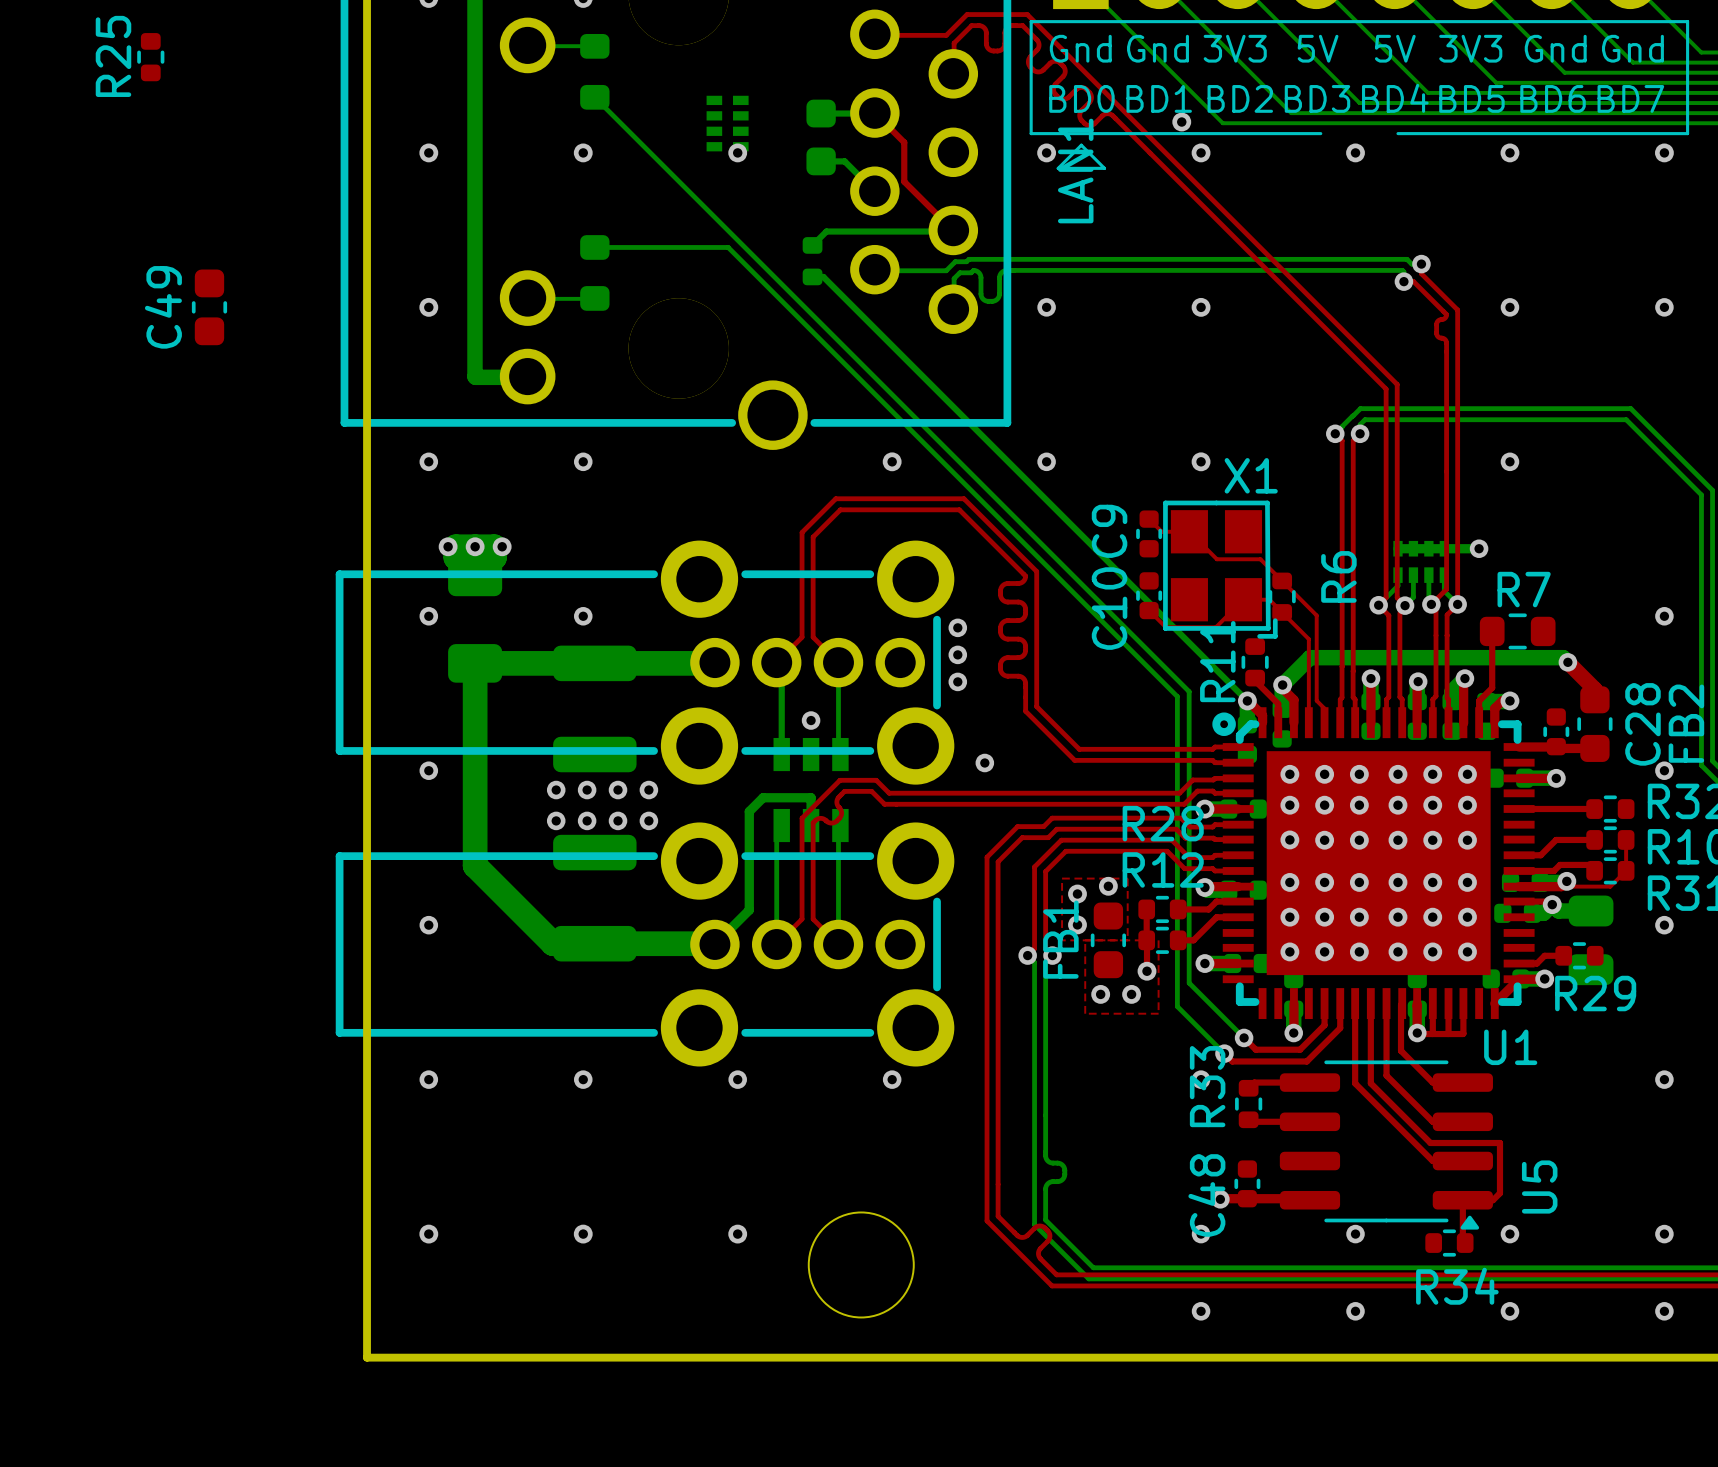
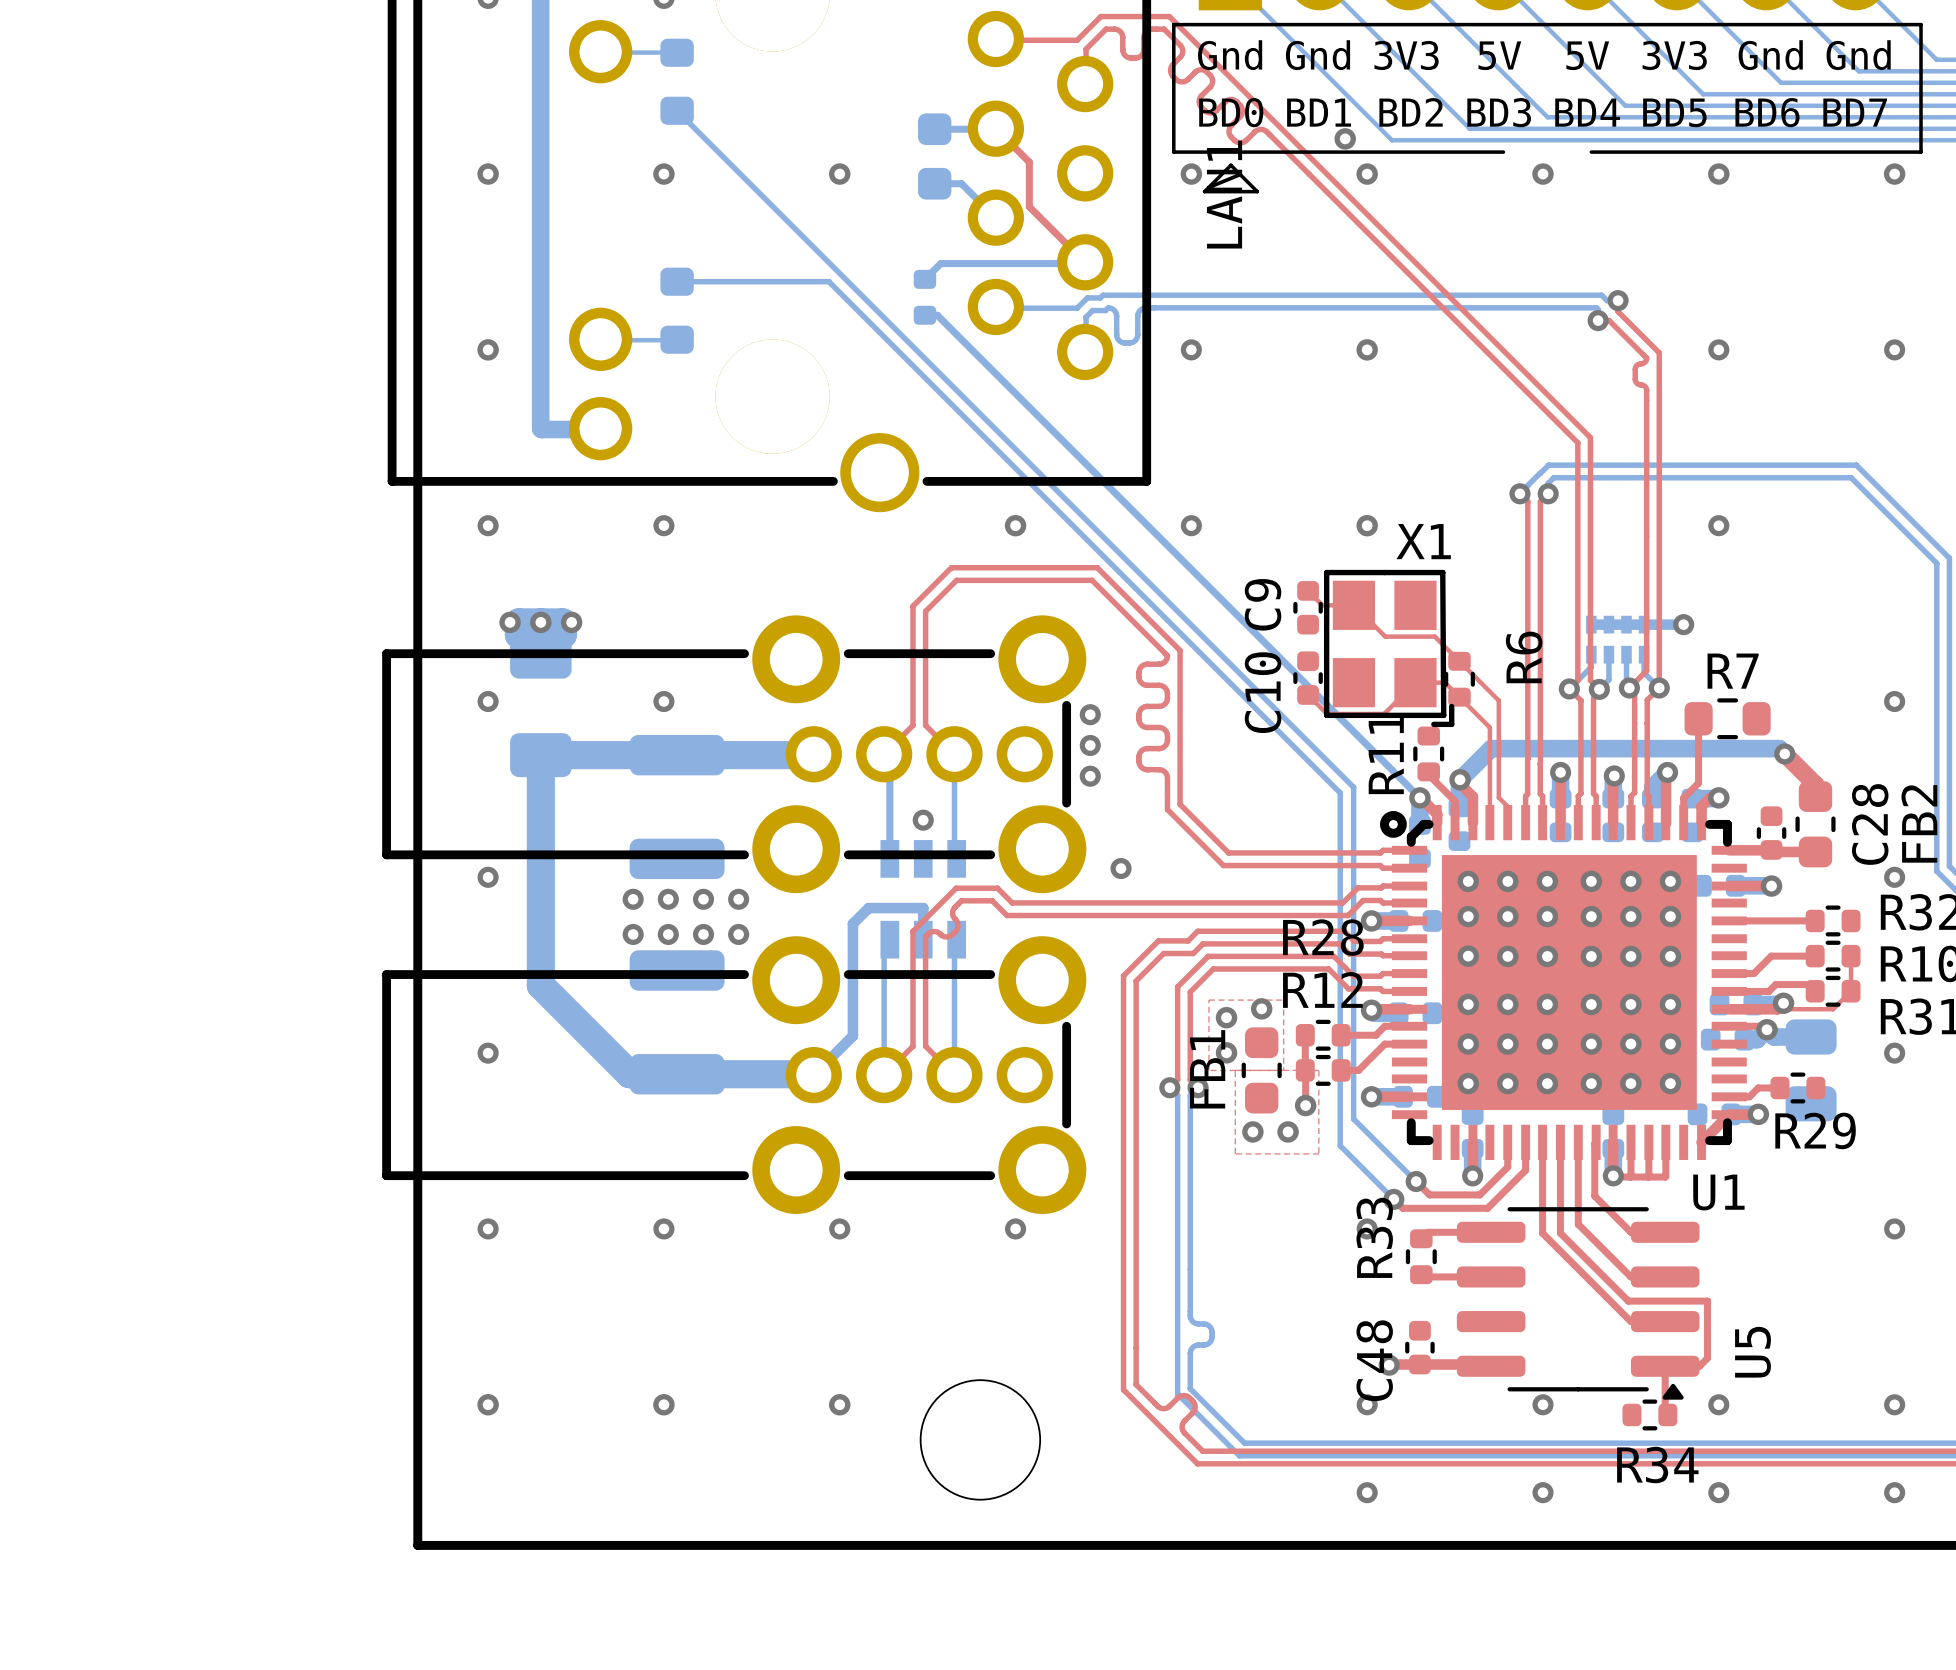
R25: (150, 57) -> none
part: (727, 123) -> none
C49: (209, 307) -> none

